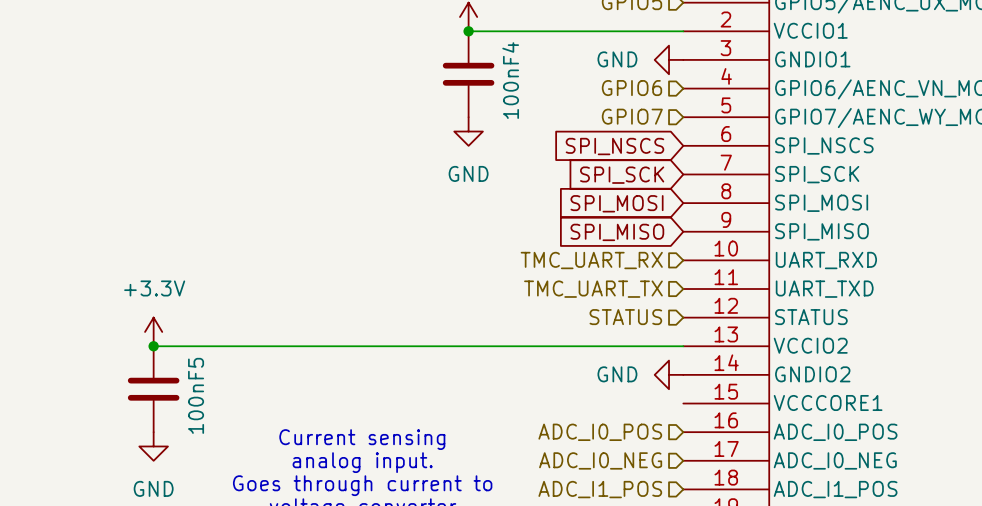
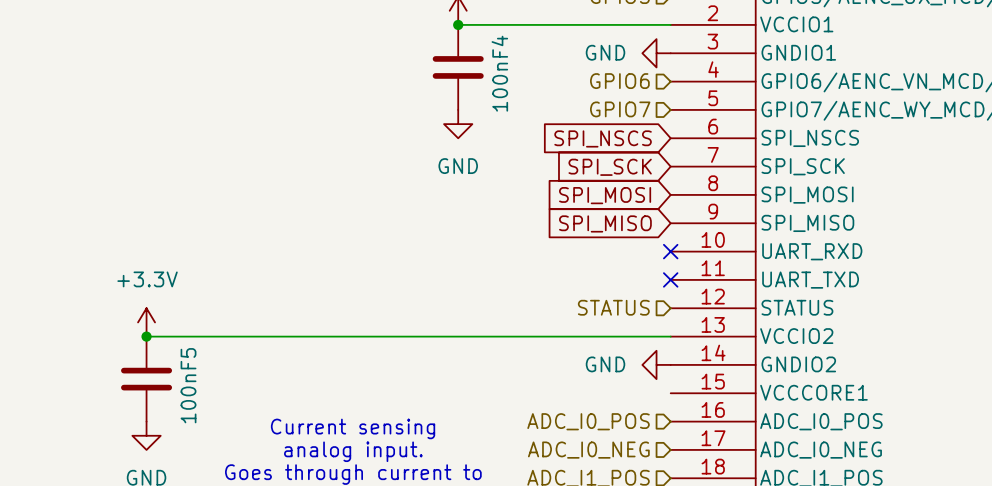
hierarchical label: TMC_UART_RX (591, 260) -> none
no-connect mark: none -> (670, 251)
hierarchical label: TMC_UART_TX (593, 289) -> none
no-connect mark: none -> (670, 279)

